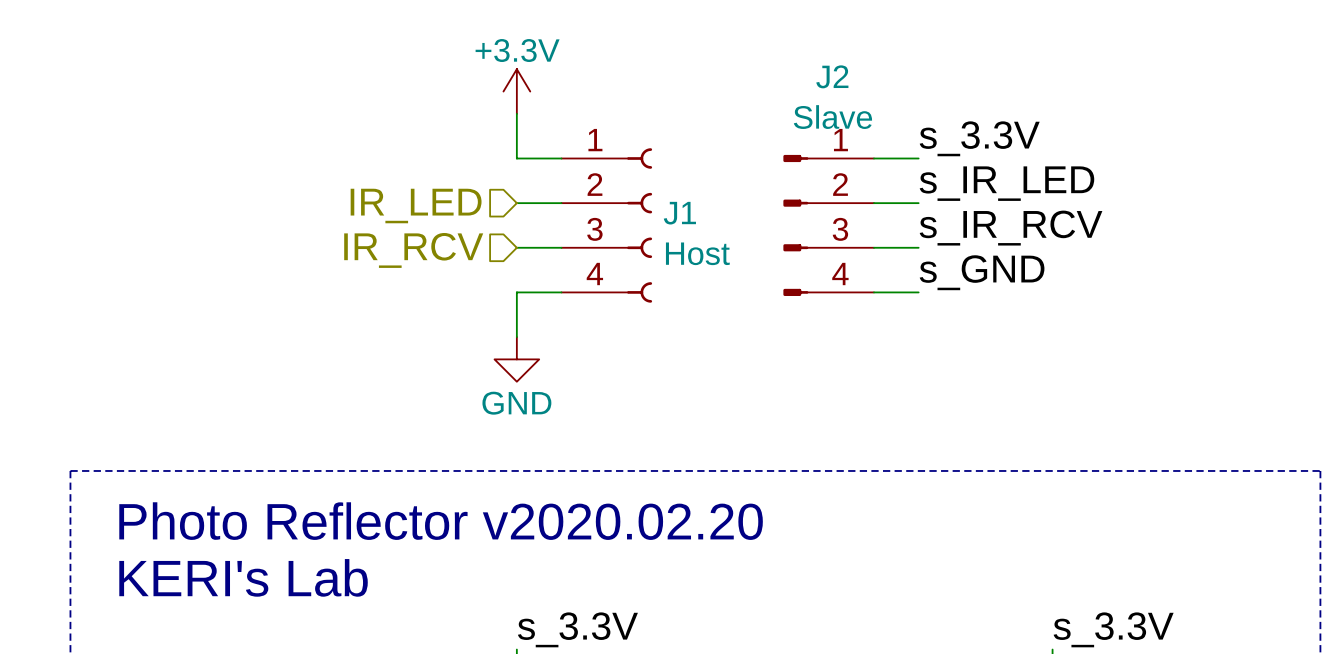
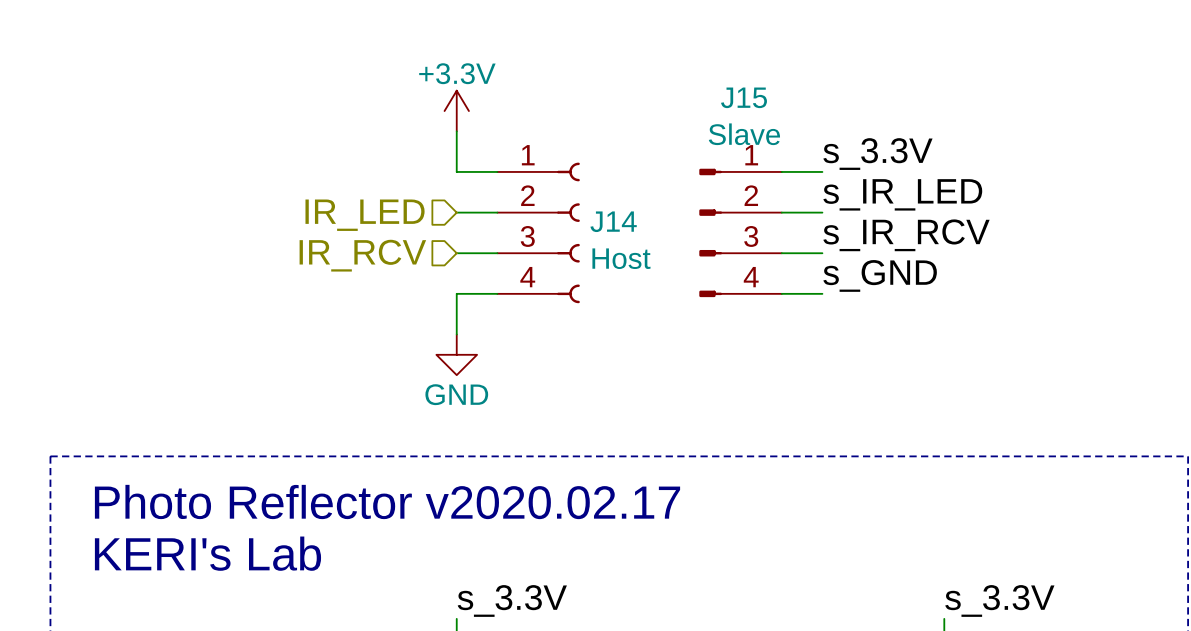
J2 name: J2 (832, 76) -> J15 (744, 97)
J1 name: J1 (679, 213) -> J14 (613, 221)
text: Photo Reflector v2020.02.20 (441, 521) -> Photo Reflector v2020.02.17 (387, 501)

